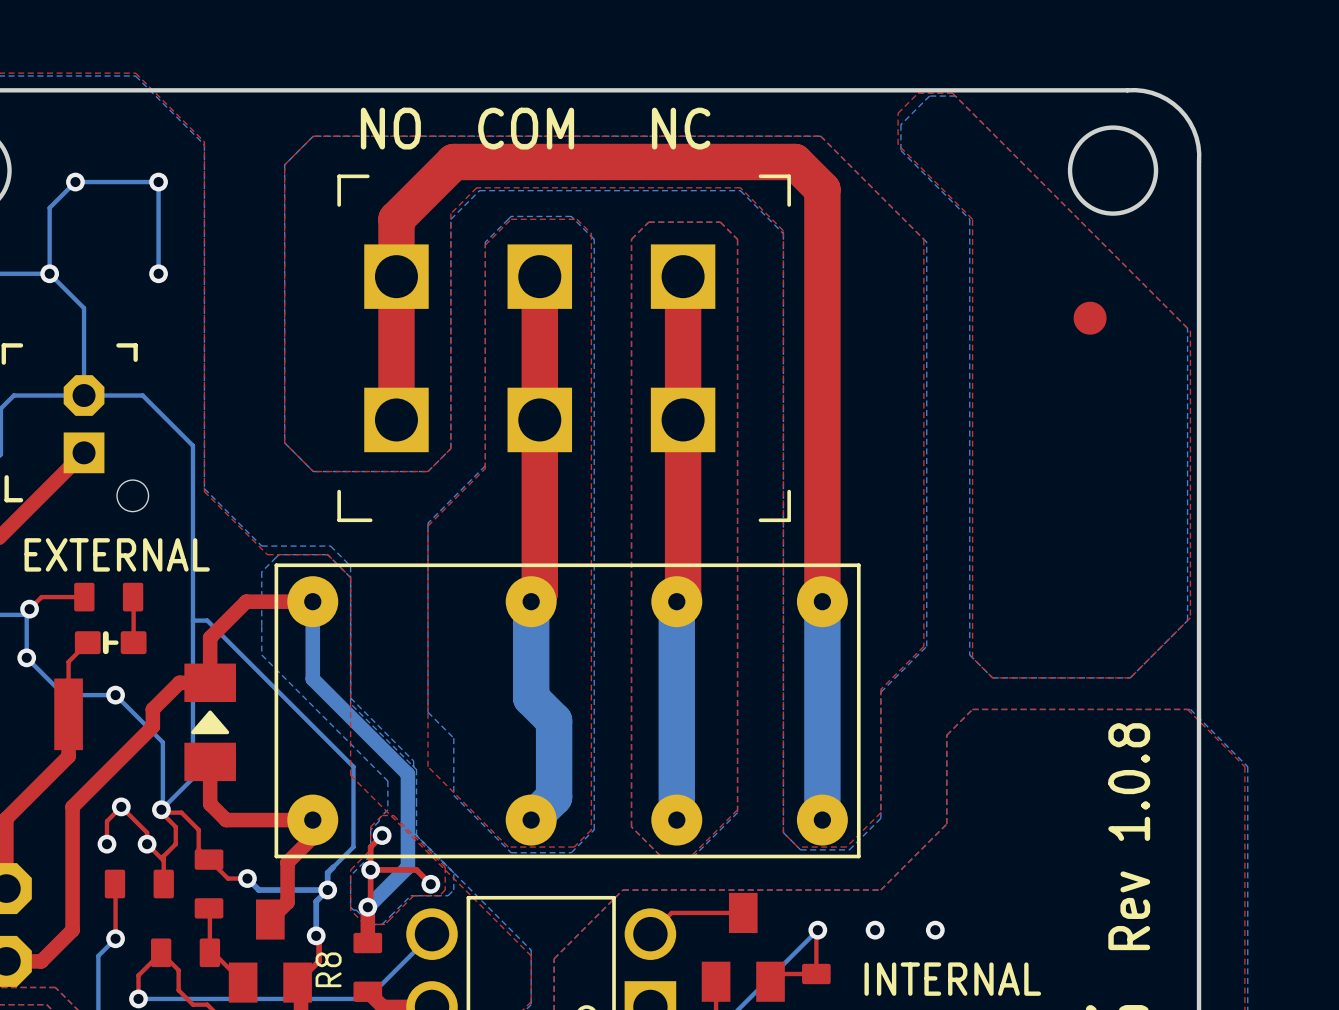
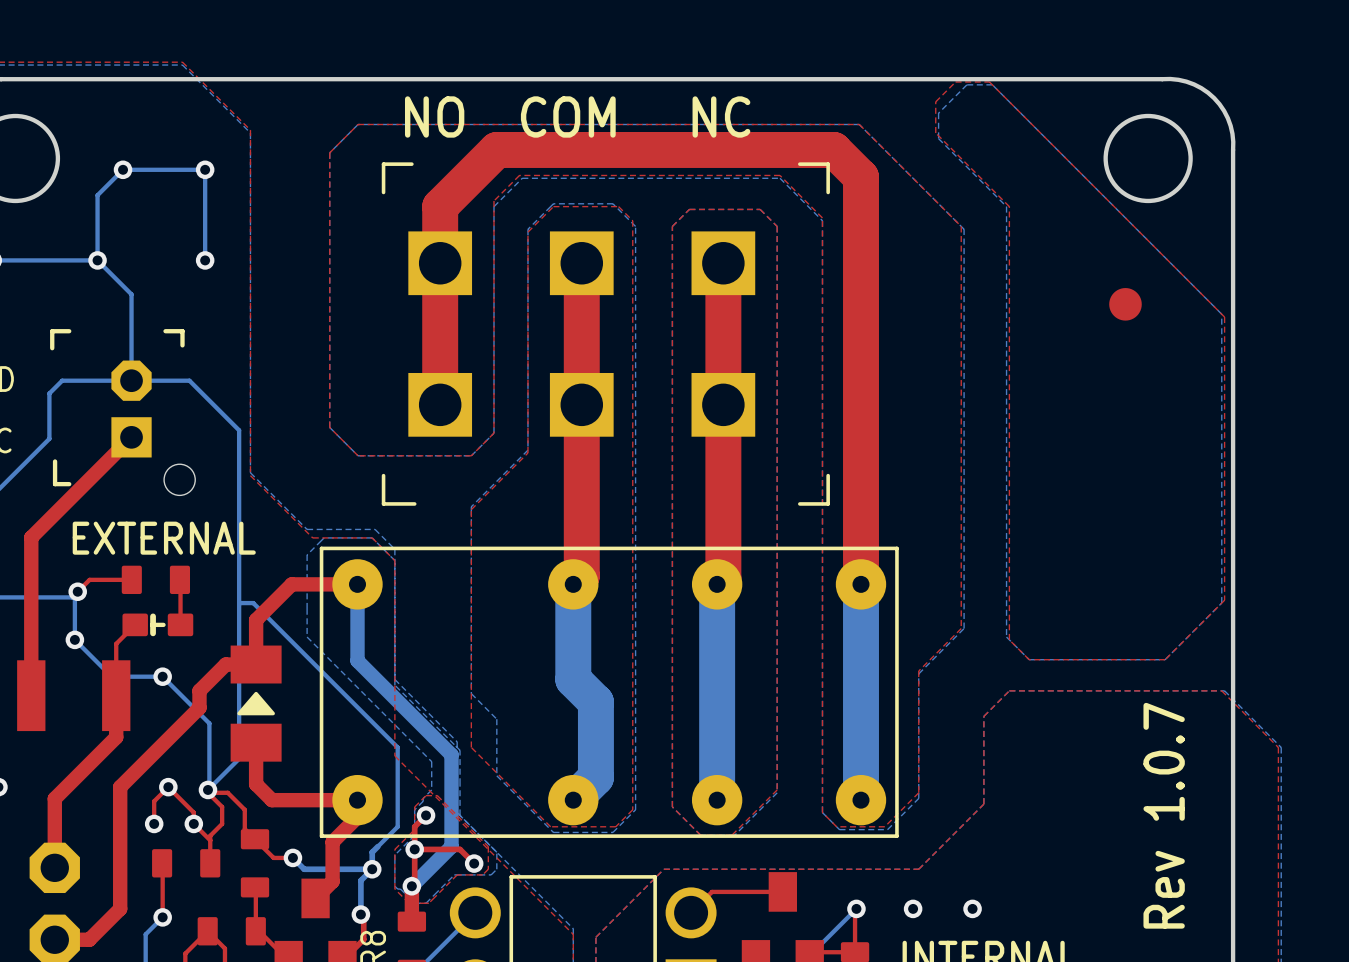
text: Rev 1.0.8 (1129, 836) -> Rev 1.0.7 (1164, 815)

